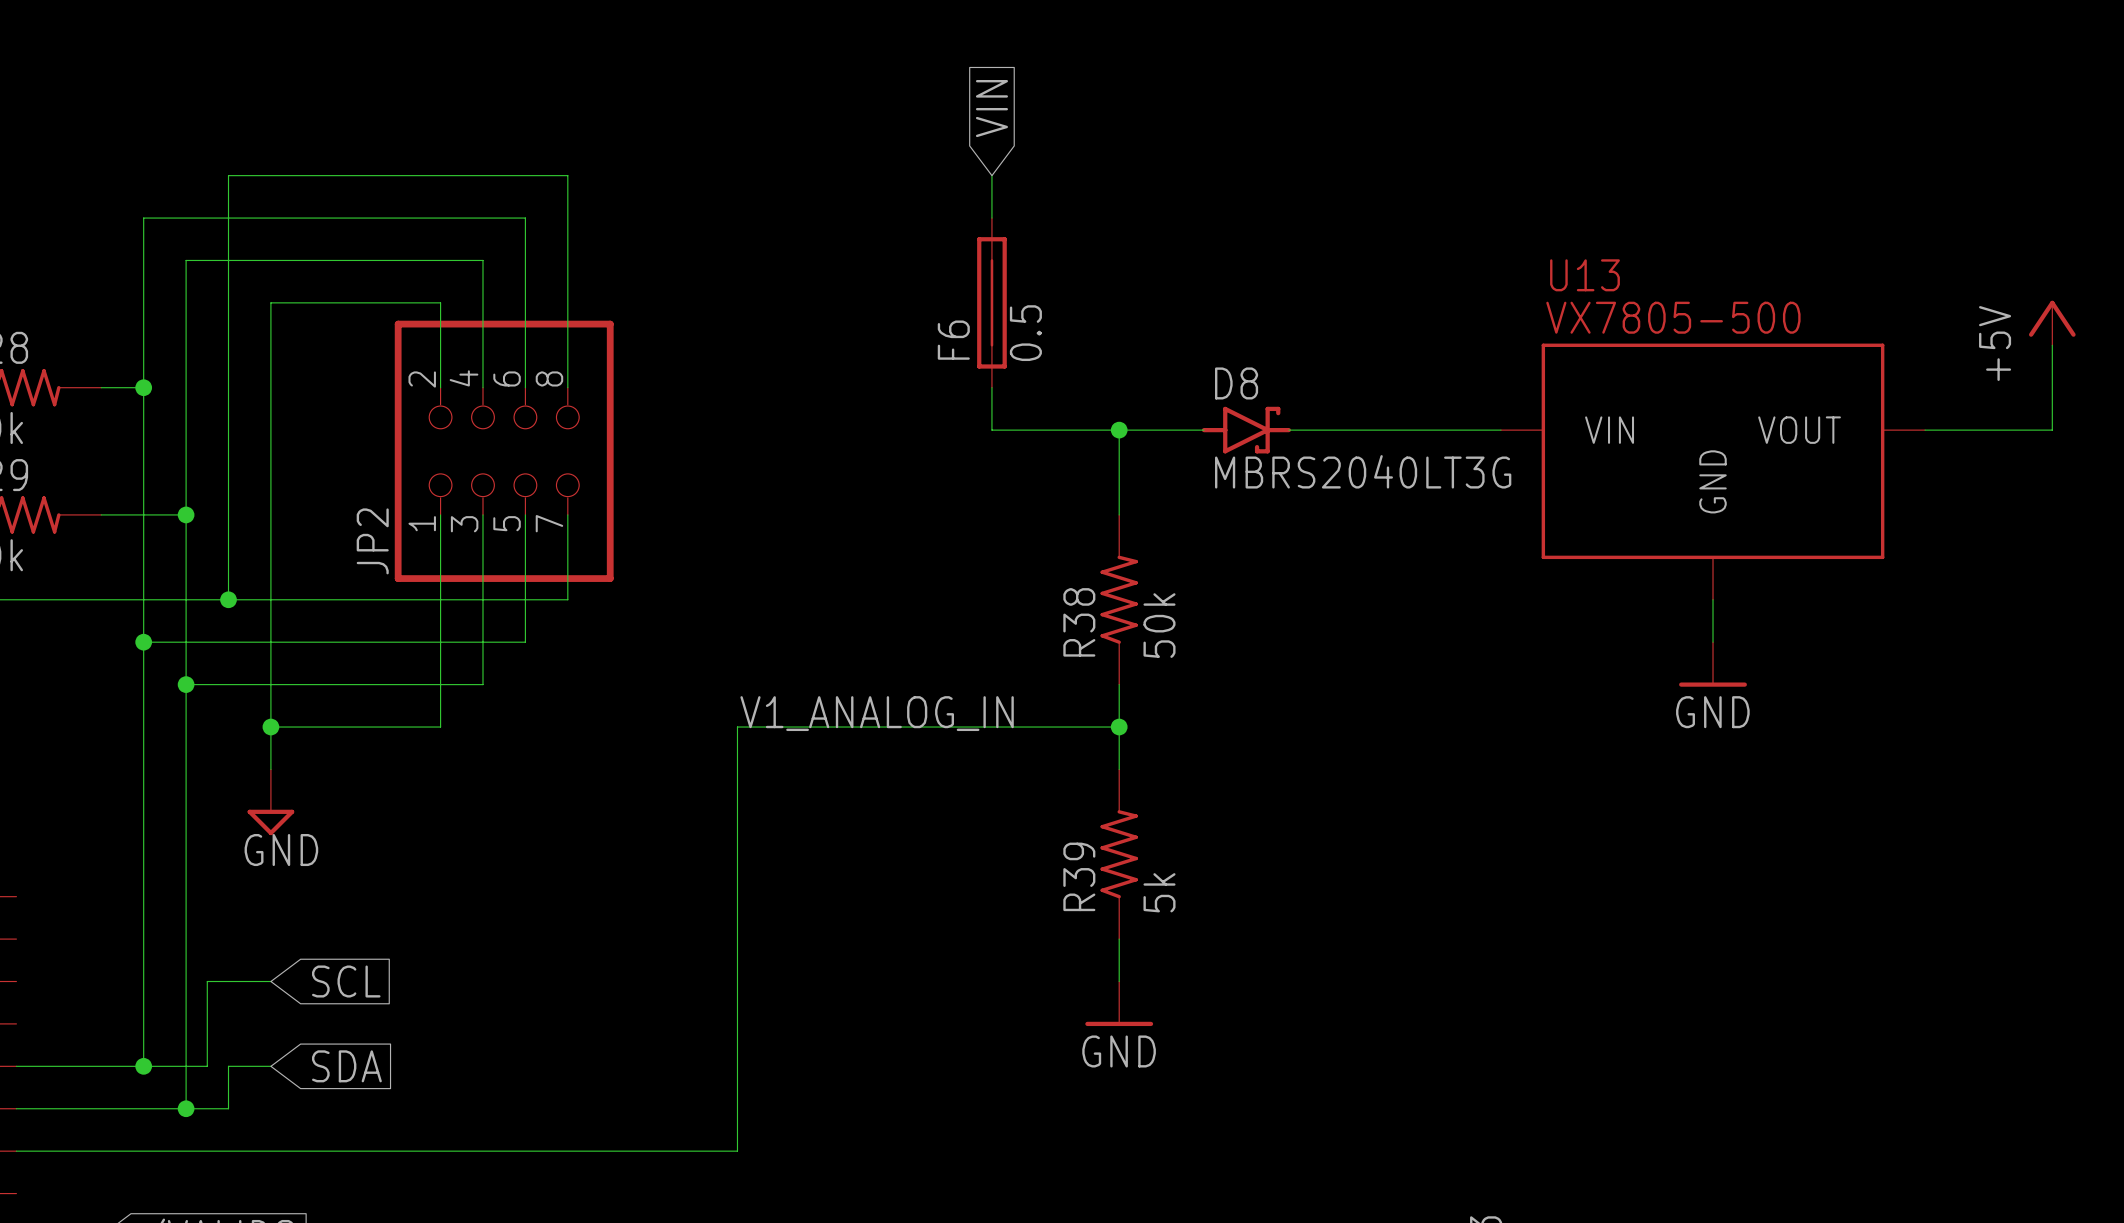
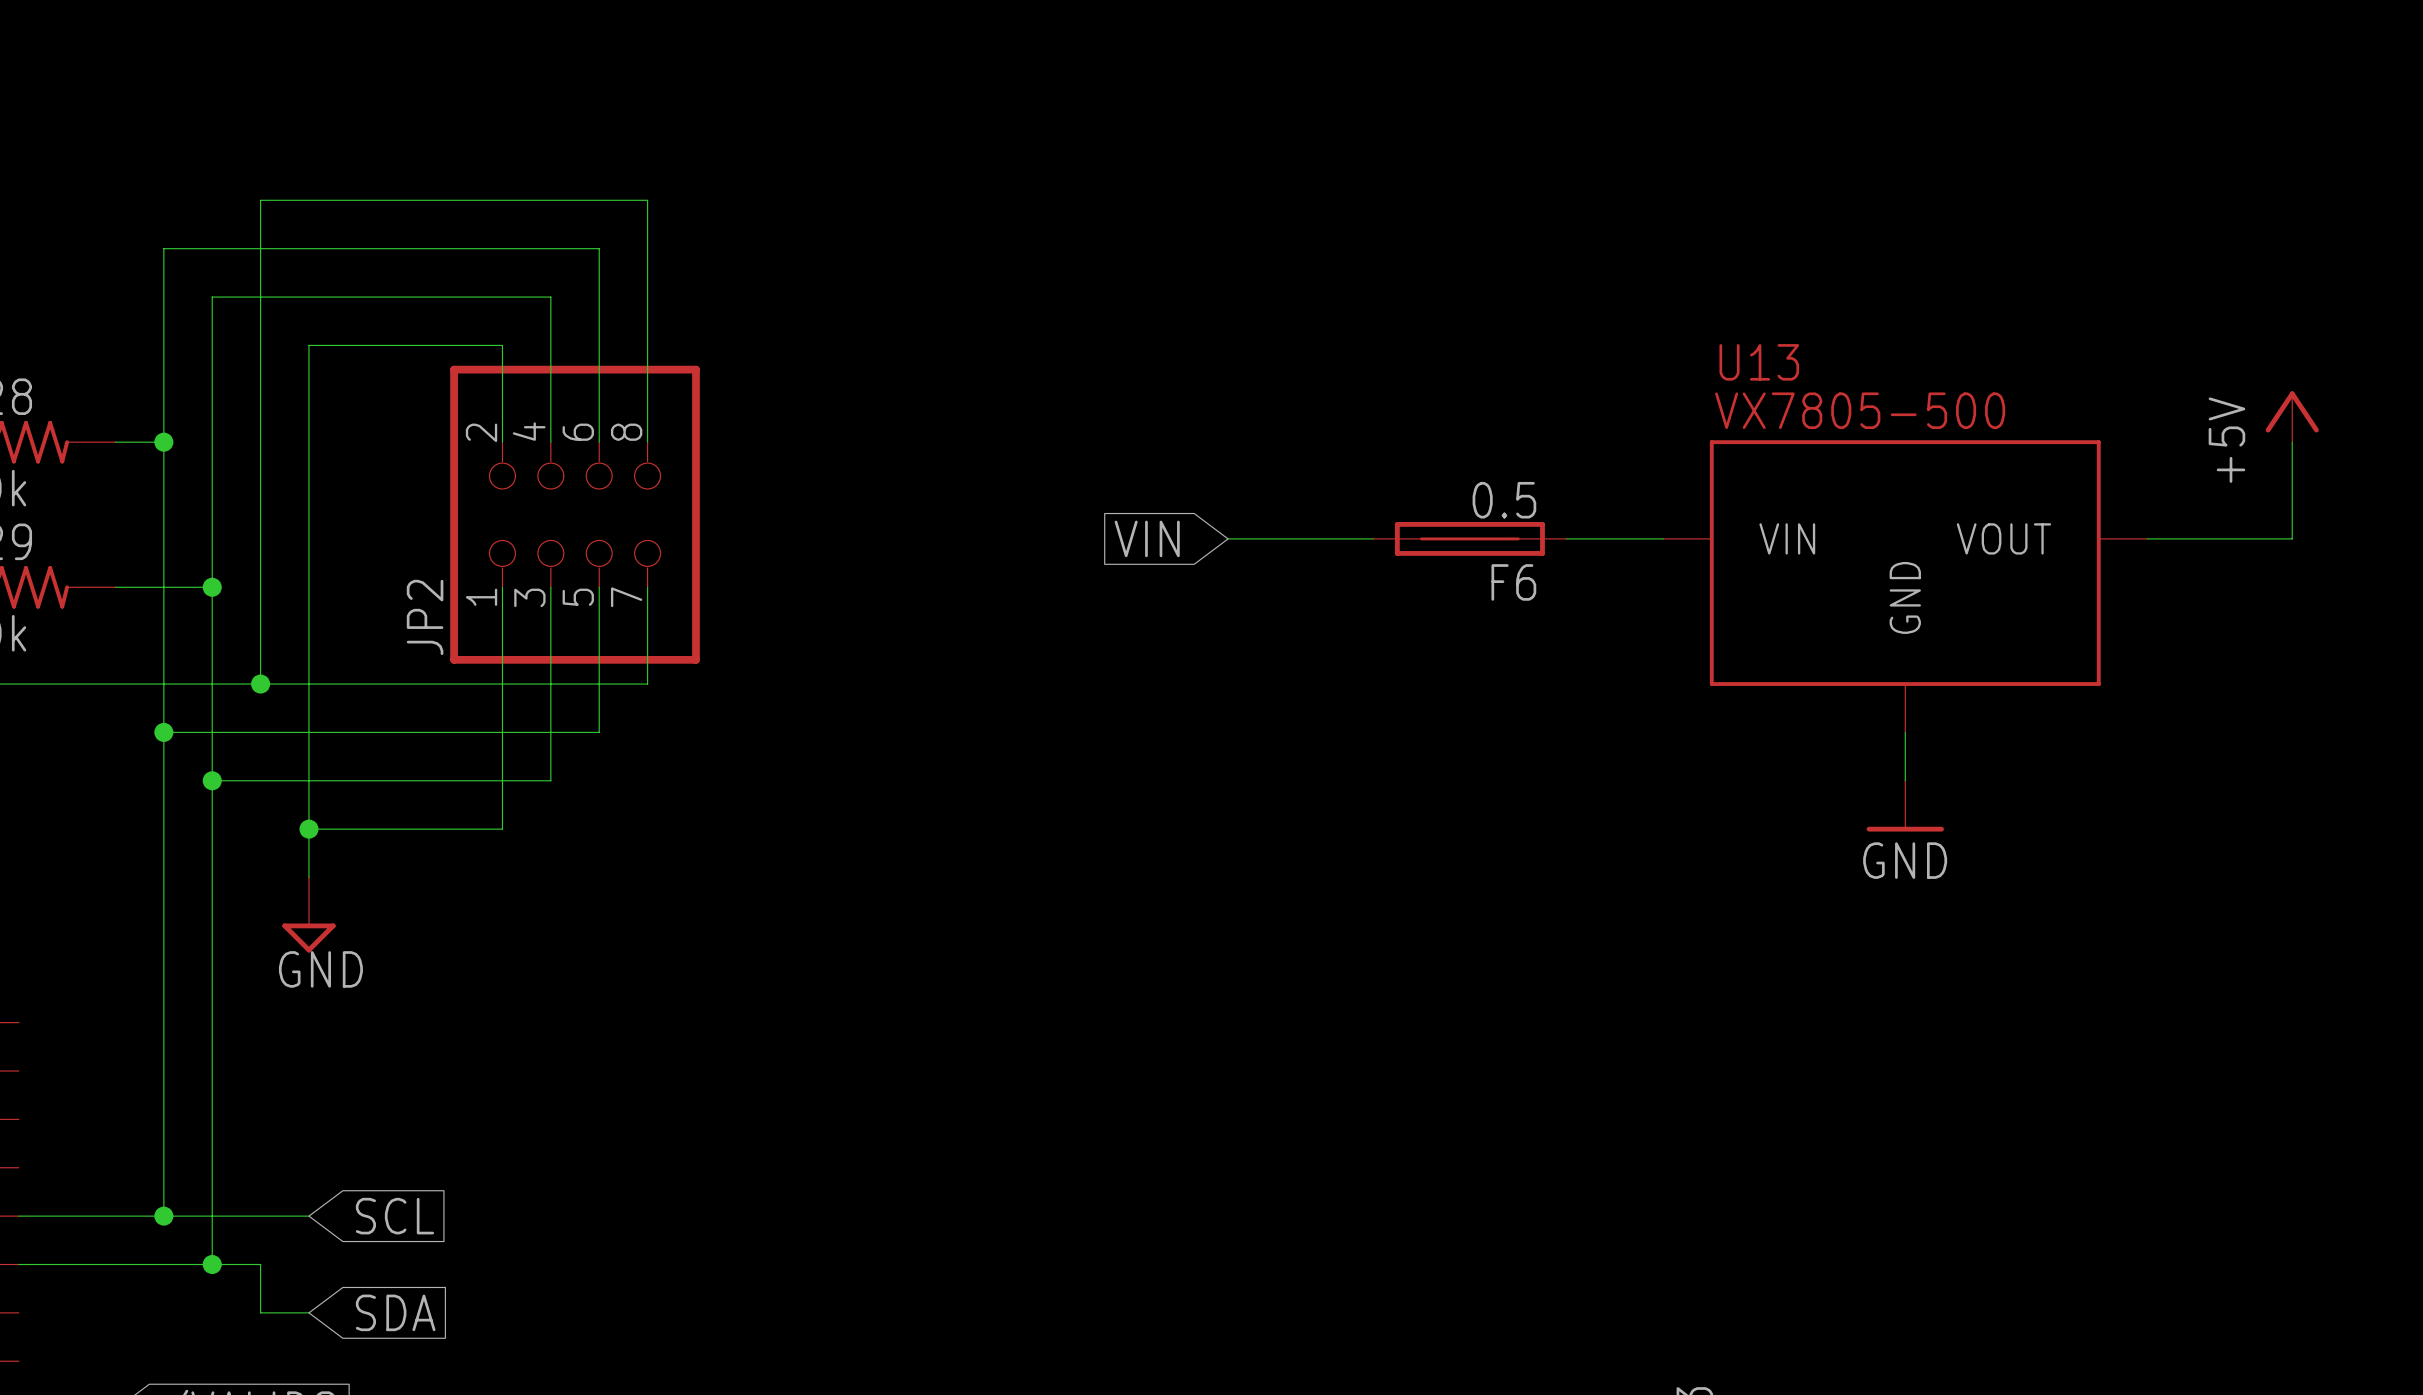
global label rotation: 0° (991, 108) -> 90° counterclockwise (1147, 538)
global label position: VIN (991, 108) -> VIN (1147, 538)
wire: (991, 175) (991, 218) -> none
F6 rotation: 0° (991, 302) -> 90° clockwise (1469, 538)
F6 position: (991, 302) -> (1469, 538)
power symbol position: +5V (2052, 323) -> +5V (2292, 416)
F6 value position: 0.5 (1025, 333) -> 0.5 (1504, 500)
F6 name position: F6 (953, 340) -> F6 (1513, 582)
wire: (2052, 345) (2052, 430) (1925, 430) -> (2292, 442) (2292, 538) (2147, 538)
wire: (991, 387) (991, 430) (1204, 430) -> none
wire: (1119, 430) (1119, 514) -> none
junction: (1119, 430) -> none
D8: MBRS2040LT3G (1246, 430) -> none
wire: (1288, 430) (1500, 430) -> none
U13 position: (1713, 471) -> (1905, 586)
wire: none -> (1228, 538) (1373, 538)
wire: none -> (1566, 538) (1663, 538)
R38: 50k (1119, 599) -> none
wire: (1713, 599) (1713, 642) -> (1905, 732) (1905, 780)
power symbol position: GND (1713, 664) -> GND (1905, 806)
wire: (1119, 684) (1119, 769) -> none
label: V1_ANALOG_IN (877, 713) -> none
wire: (1119, 727) (737, 727) (737, 1151) (270, 1151) -> none
junction: (1119, 727) -> none
R39: 5k (1119, 854) -> none
wire: (1119, 939) (1119, 981) -> none
wire: (270, 981) (207, 981) (207, 1066) -> none
global label: SCL (346, 981) -> none
power symbol: GND (1119, 1003) -> none
wire: (228, 1066) (228, 1108) -> (260, 1216) (236, 1216)
global label: SDA (346, 1066) -> SCL (394, 1216)
wire: (16, 1151) (228, 1151) -> (260, 1264) (260, 1312)
global label: none -> SDA (395, 1312)

